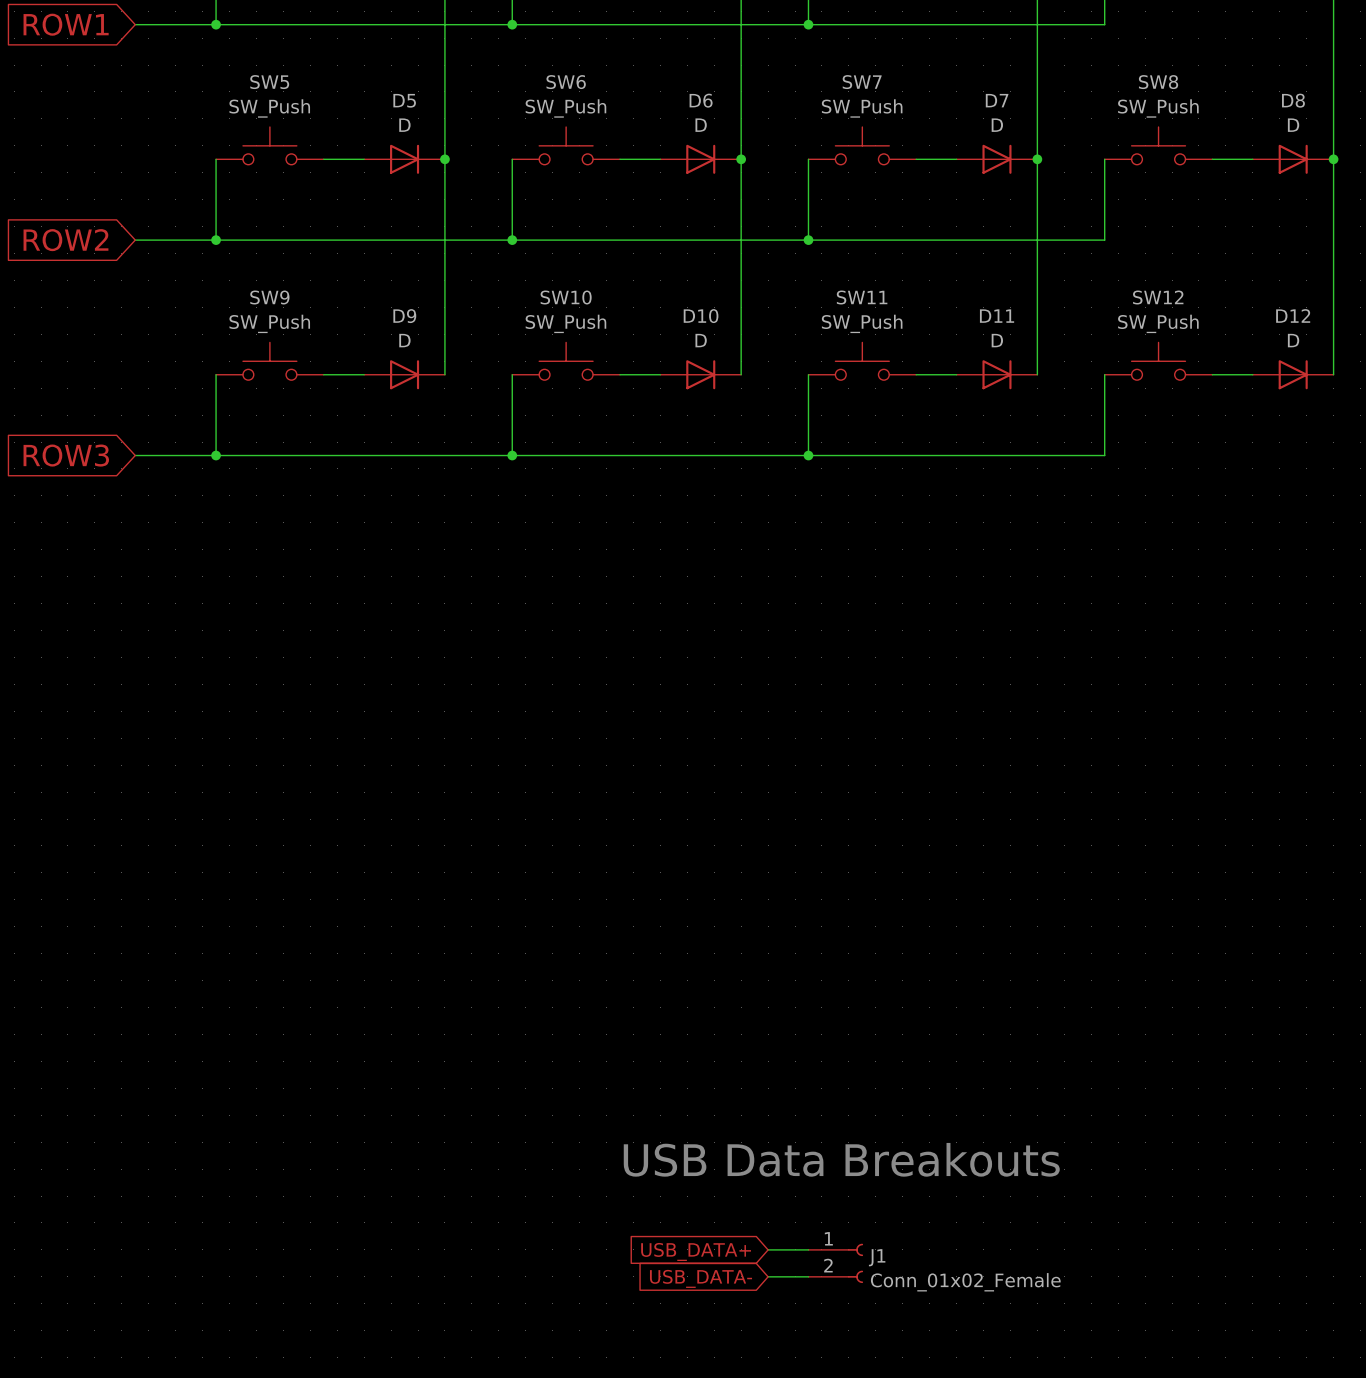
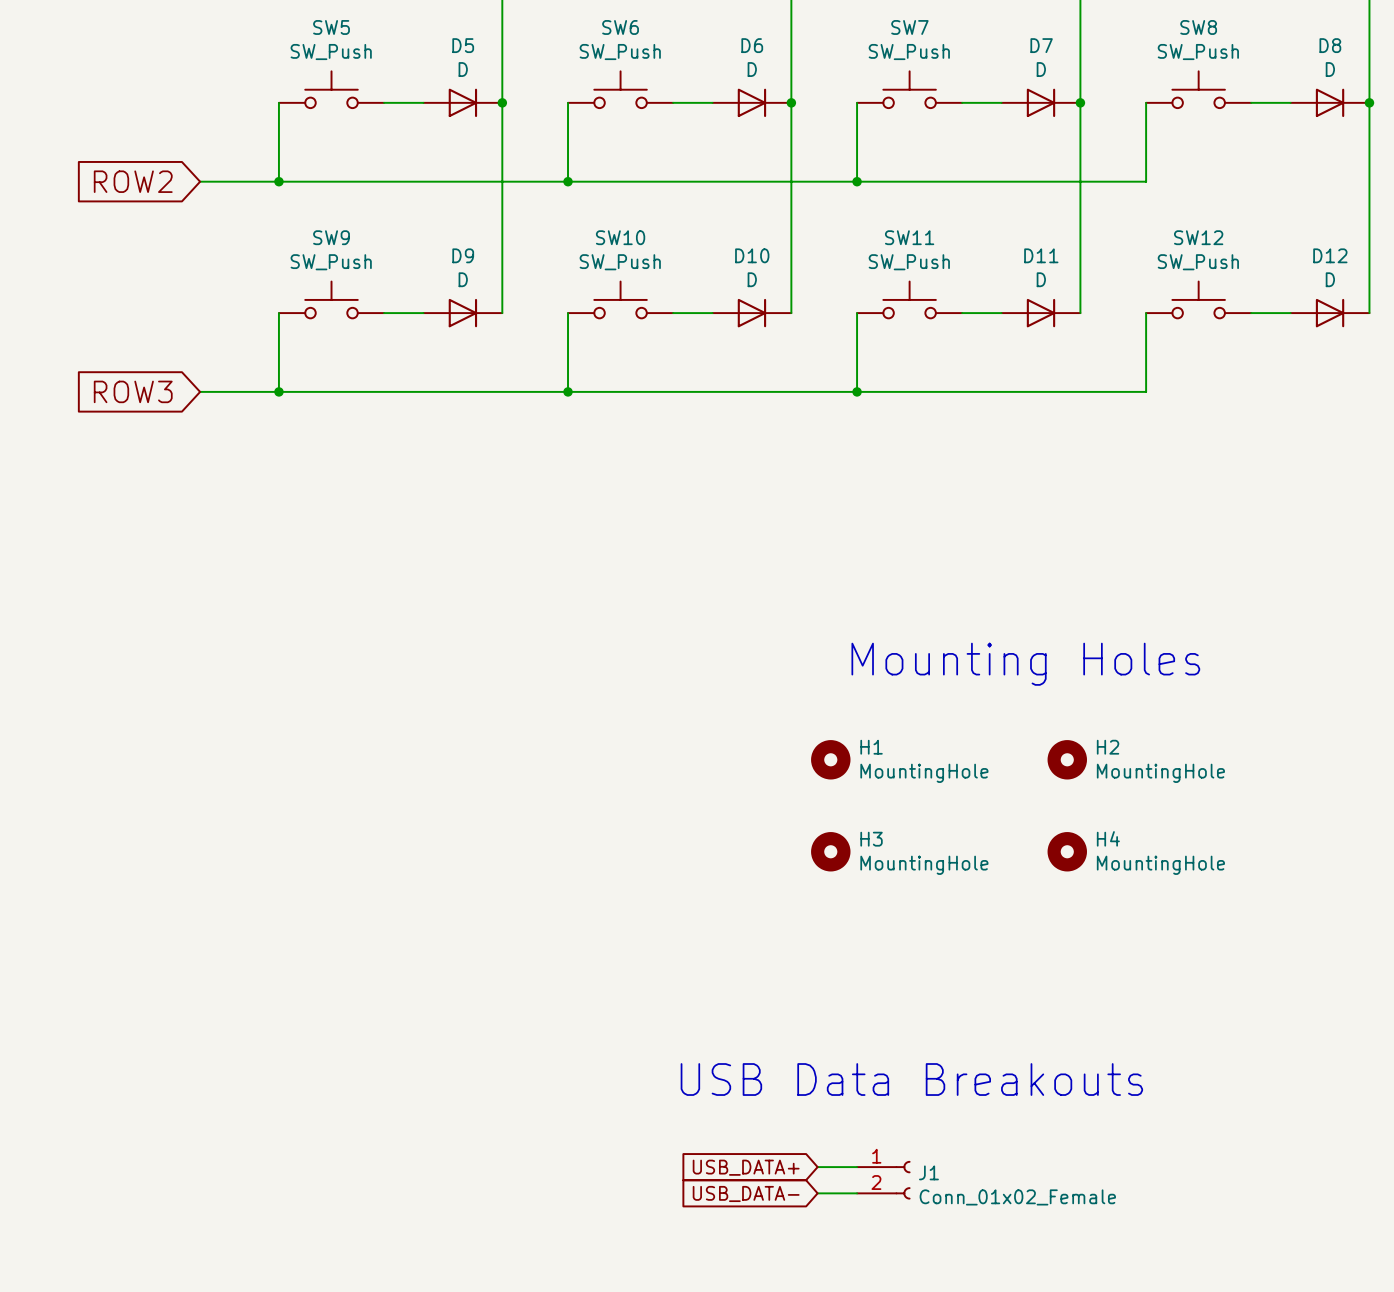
text: none -> Mounting Holes (1025, 664)
H1: none -> MountingHole (830, 759)
H2: none -> MountingHole (1067, 759)
H3: none -> MountingHole (830, 851)
H4: none -> MountingHole (1067, 851)

